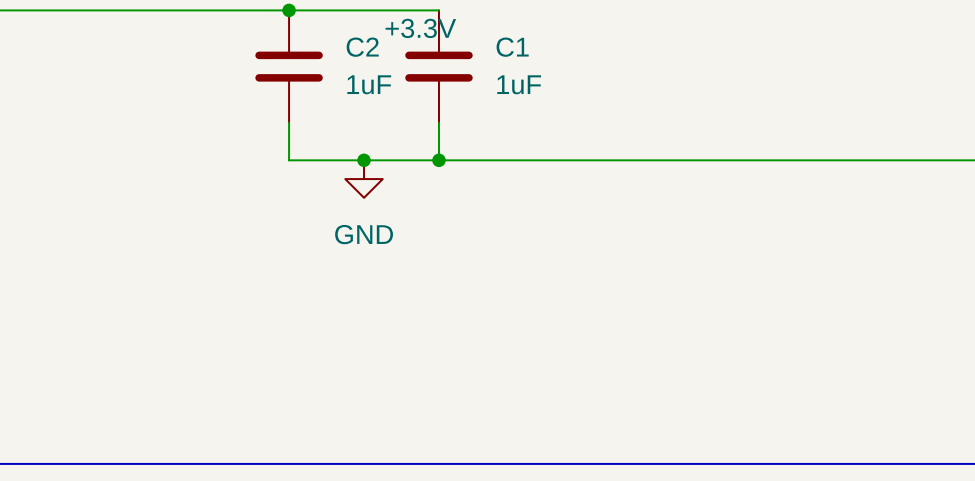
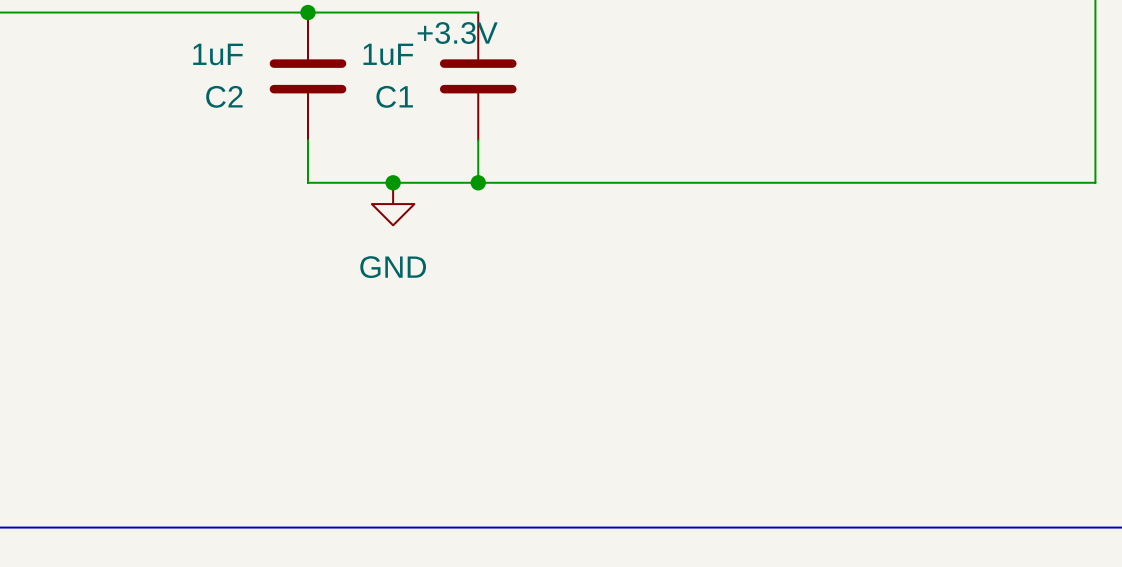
C2 name position: C2 (362, 47) -> C2 (224, 96)
C1 name position: C1 (512, 47) -> C1 (394, 96)
C2 value position: 1uF (369, 84) -> 1uF (218, 54)
C1 value position: 1uF (519, 84) -> 1uF (388, 54)

